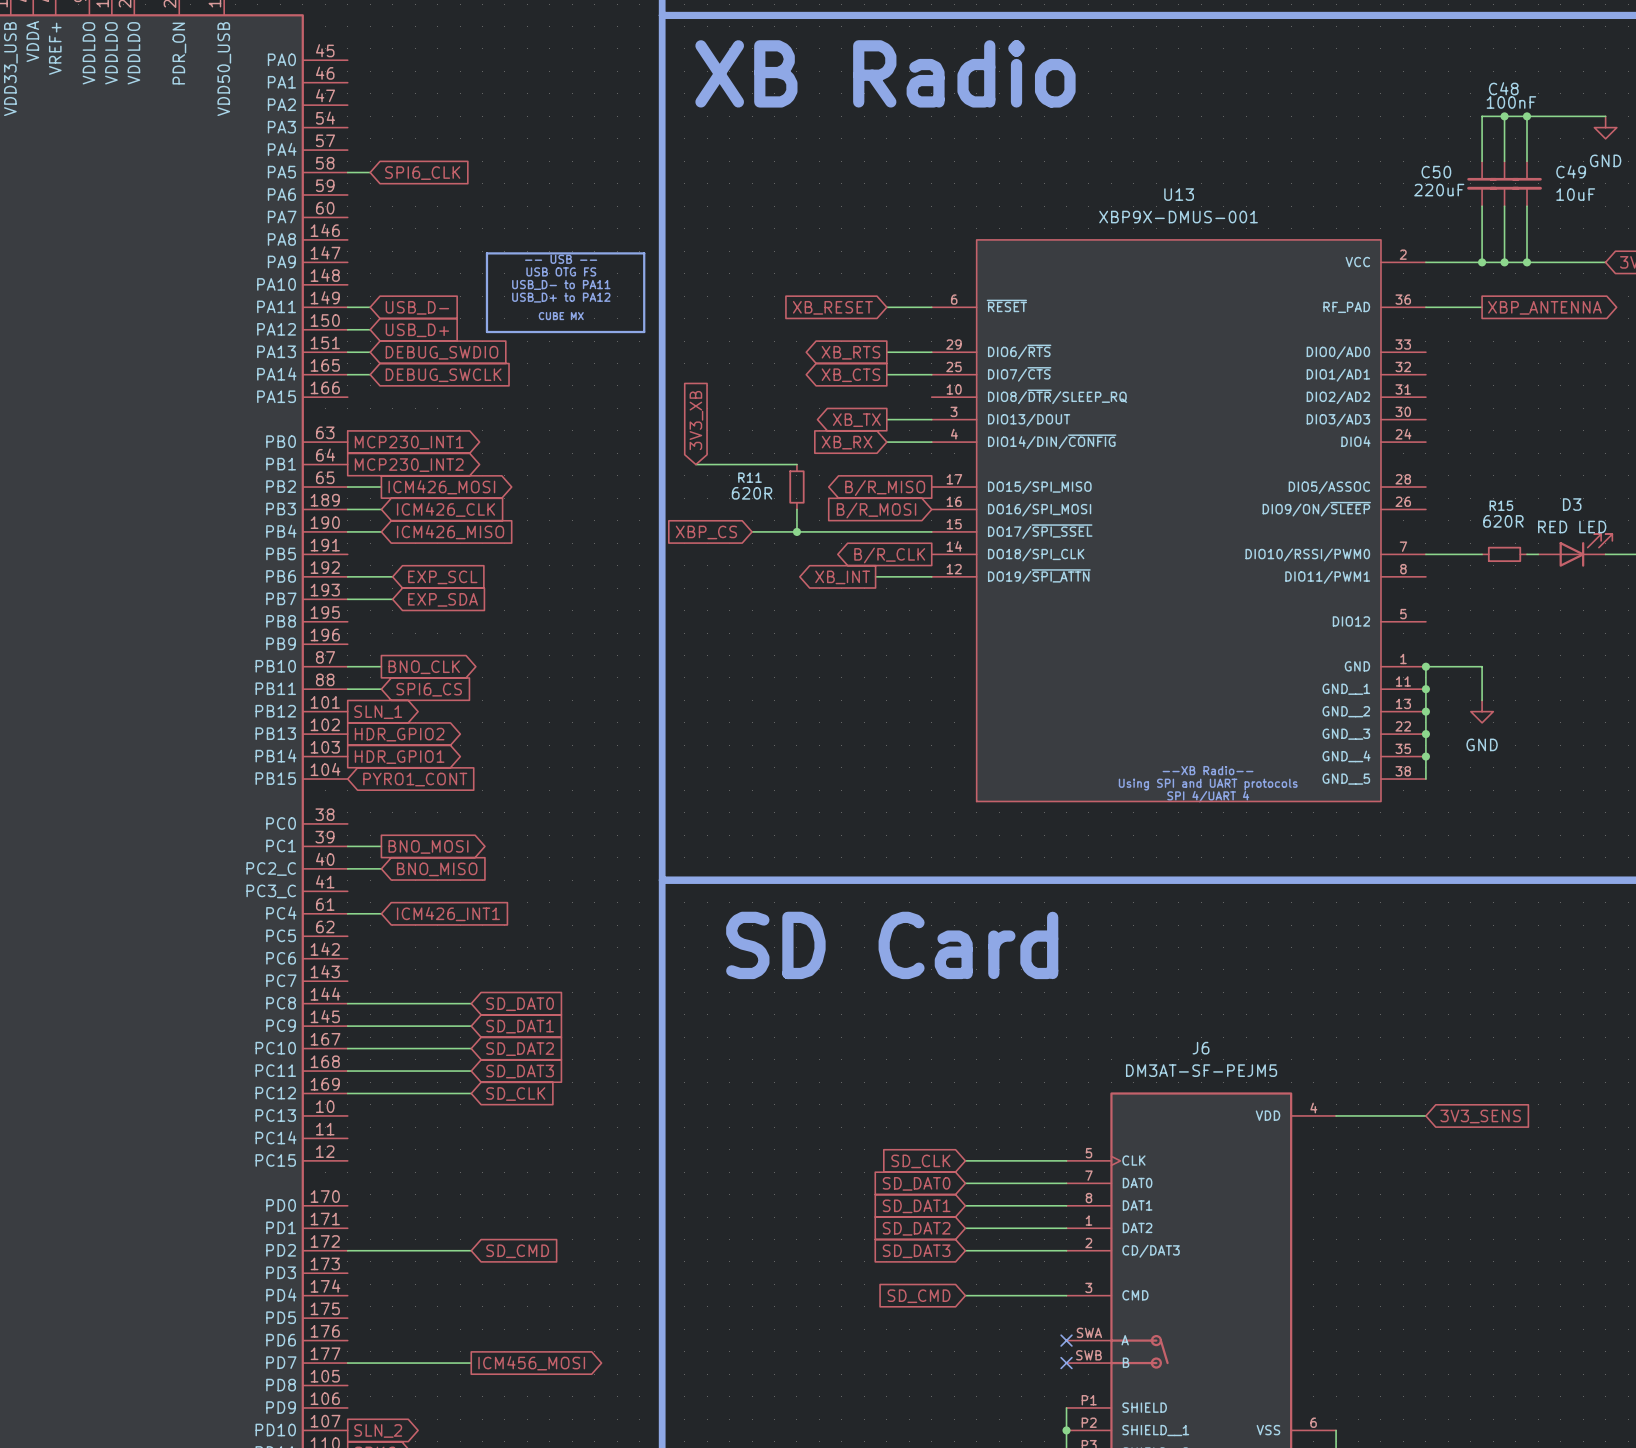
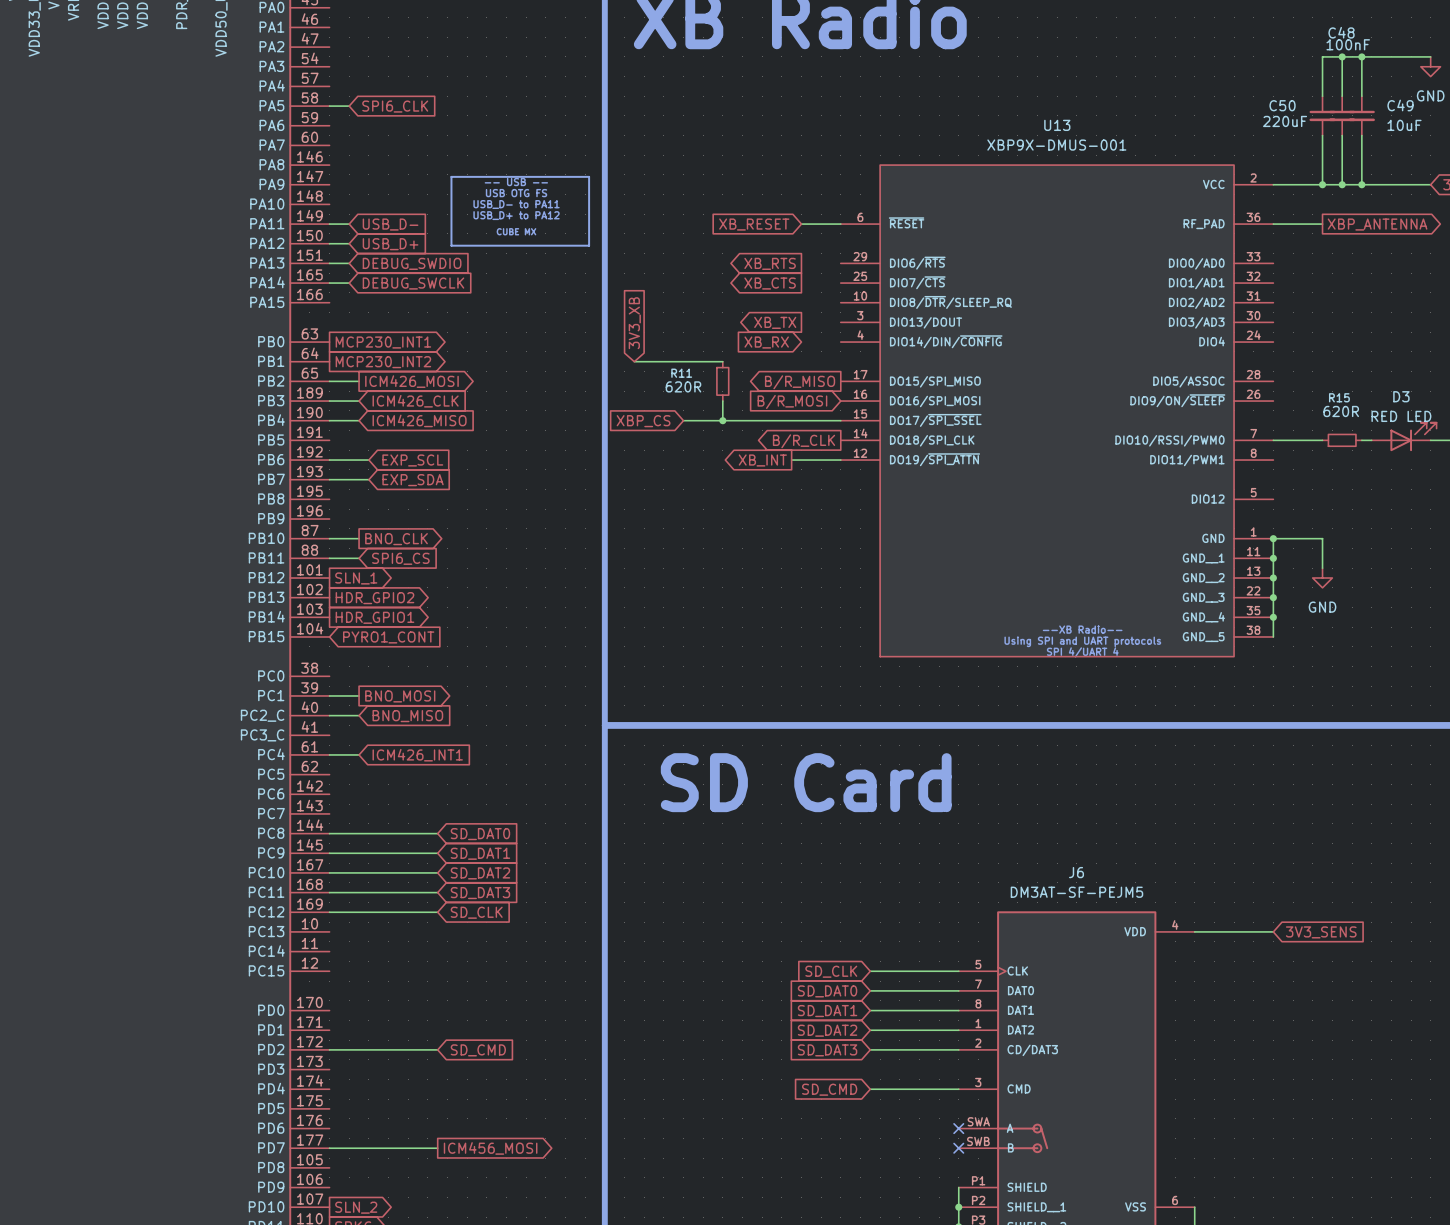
wire: (886, 352) (931, 352) -> none
wire: (886, 374) (931, 374) -> none
wire: (886, 419) (931, 419) -> none
wire: (886, 442) (931, 442) -> none

